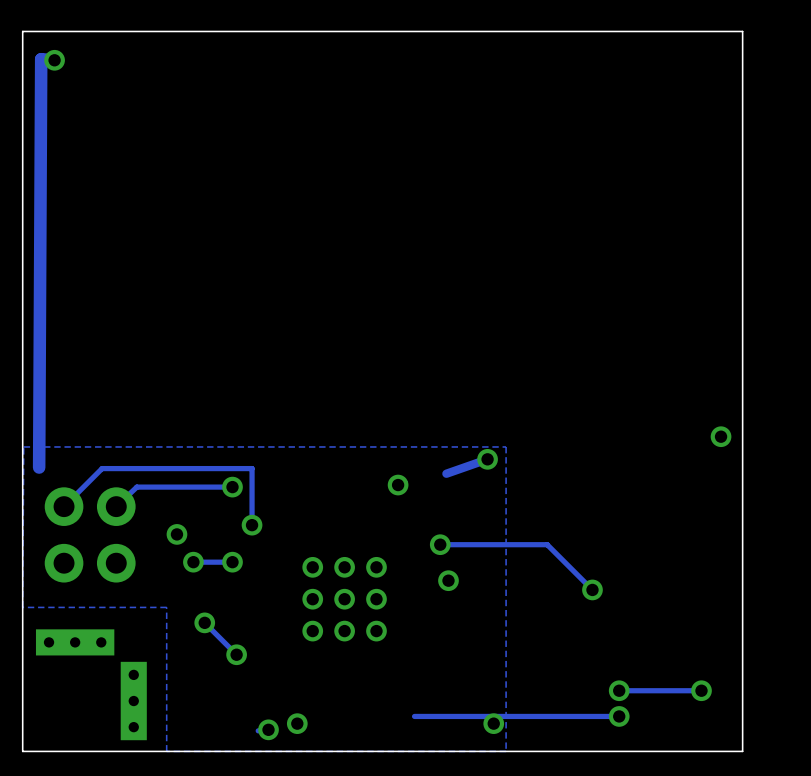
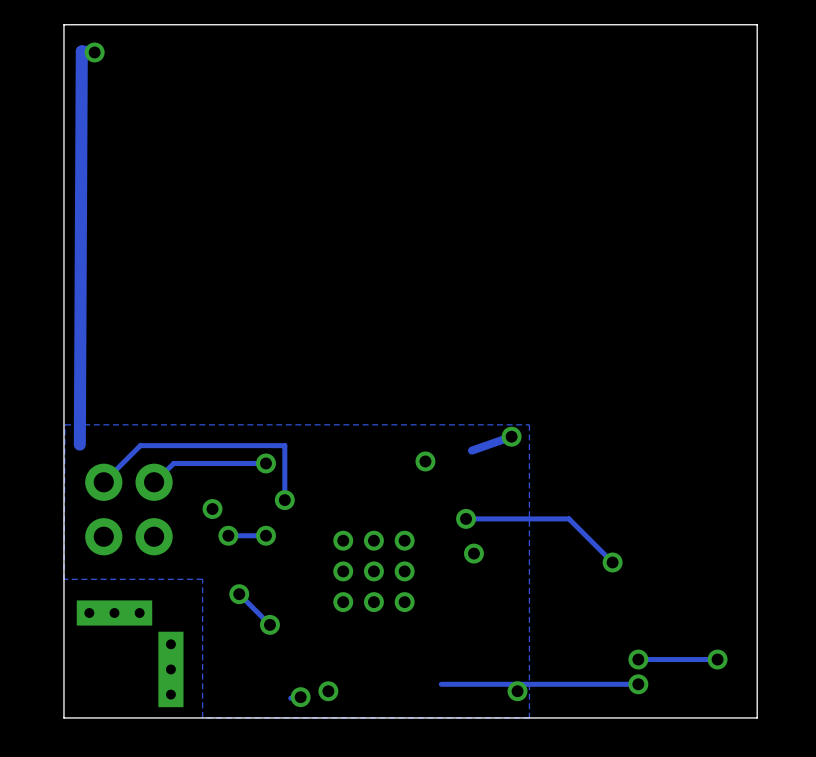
via: (721, 436) -> none

